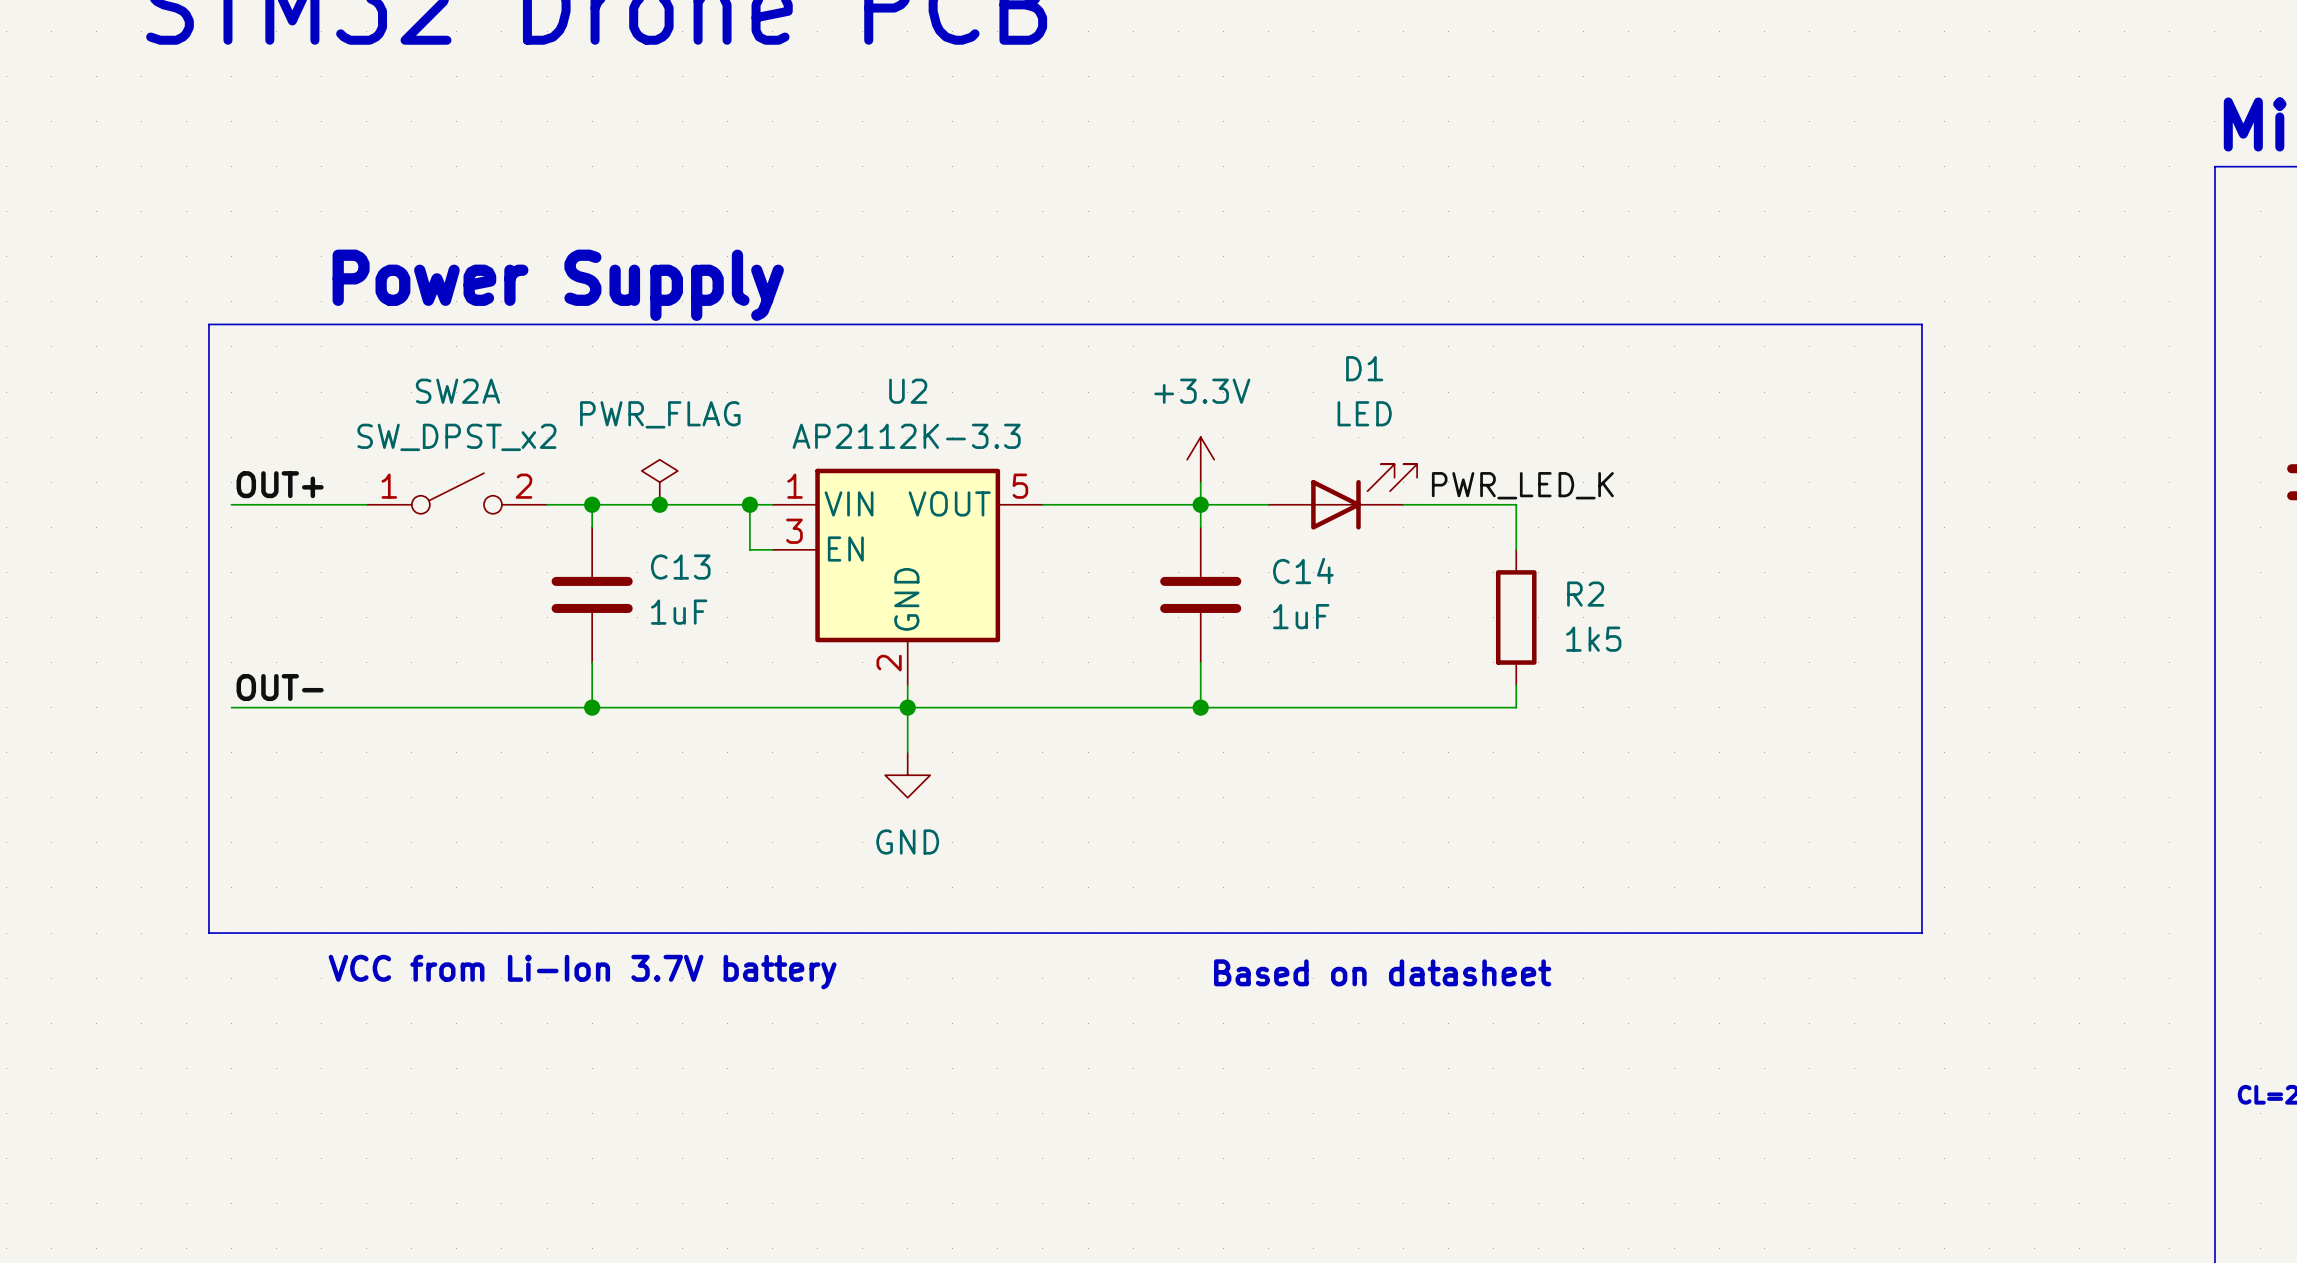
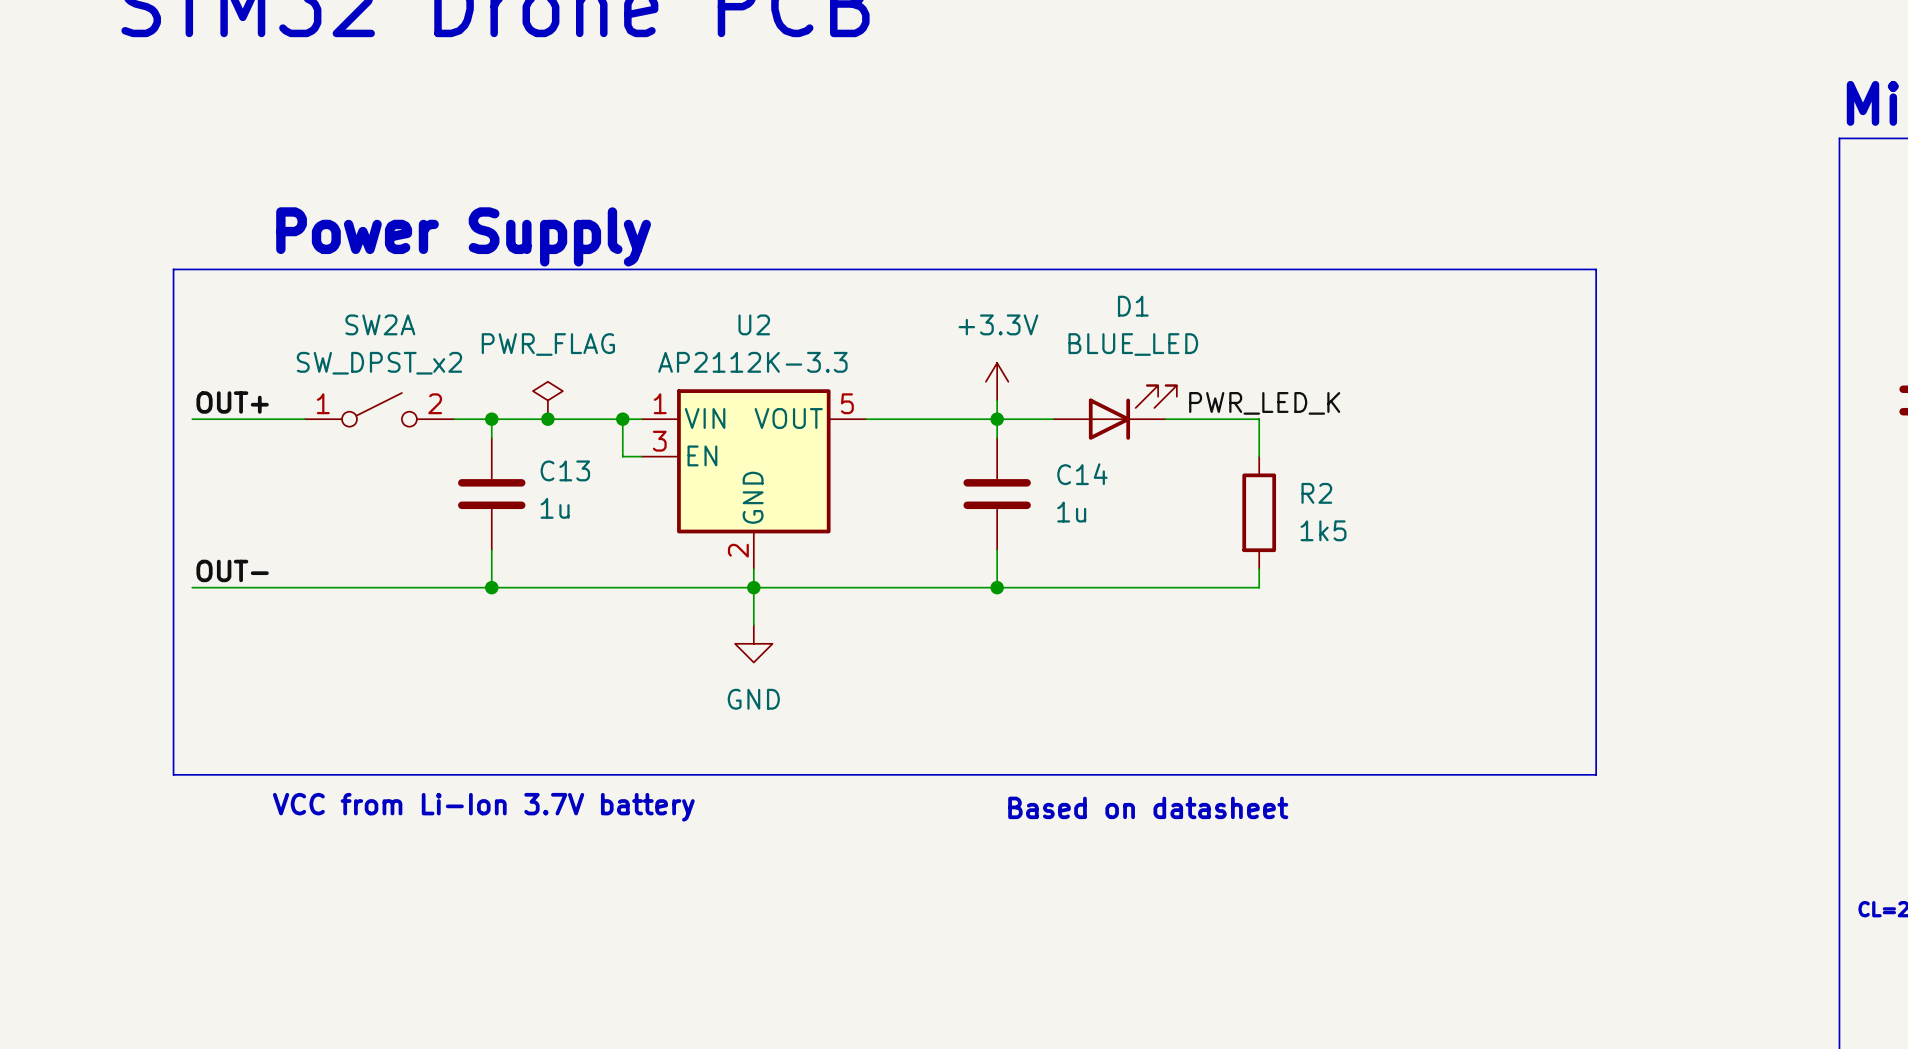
D1 value: LED (1364, 413) -> BLUE_LED (1133, 344)
C13 value: 1uF (679, 612) -> 1u (555, 508)
C14 value: 1uF (1301, 616) -> 1u (1071, 512)

